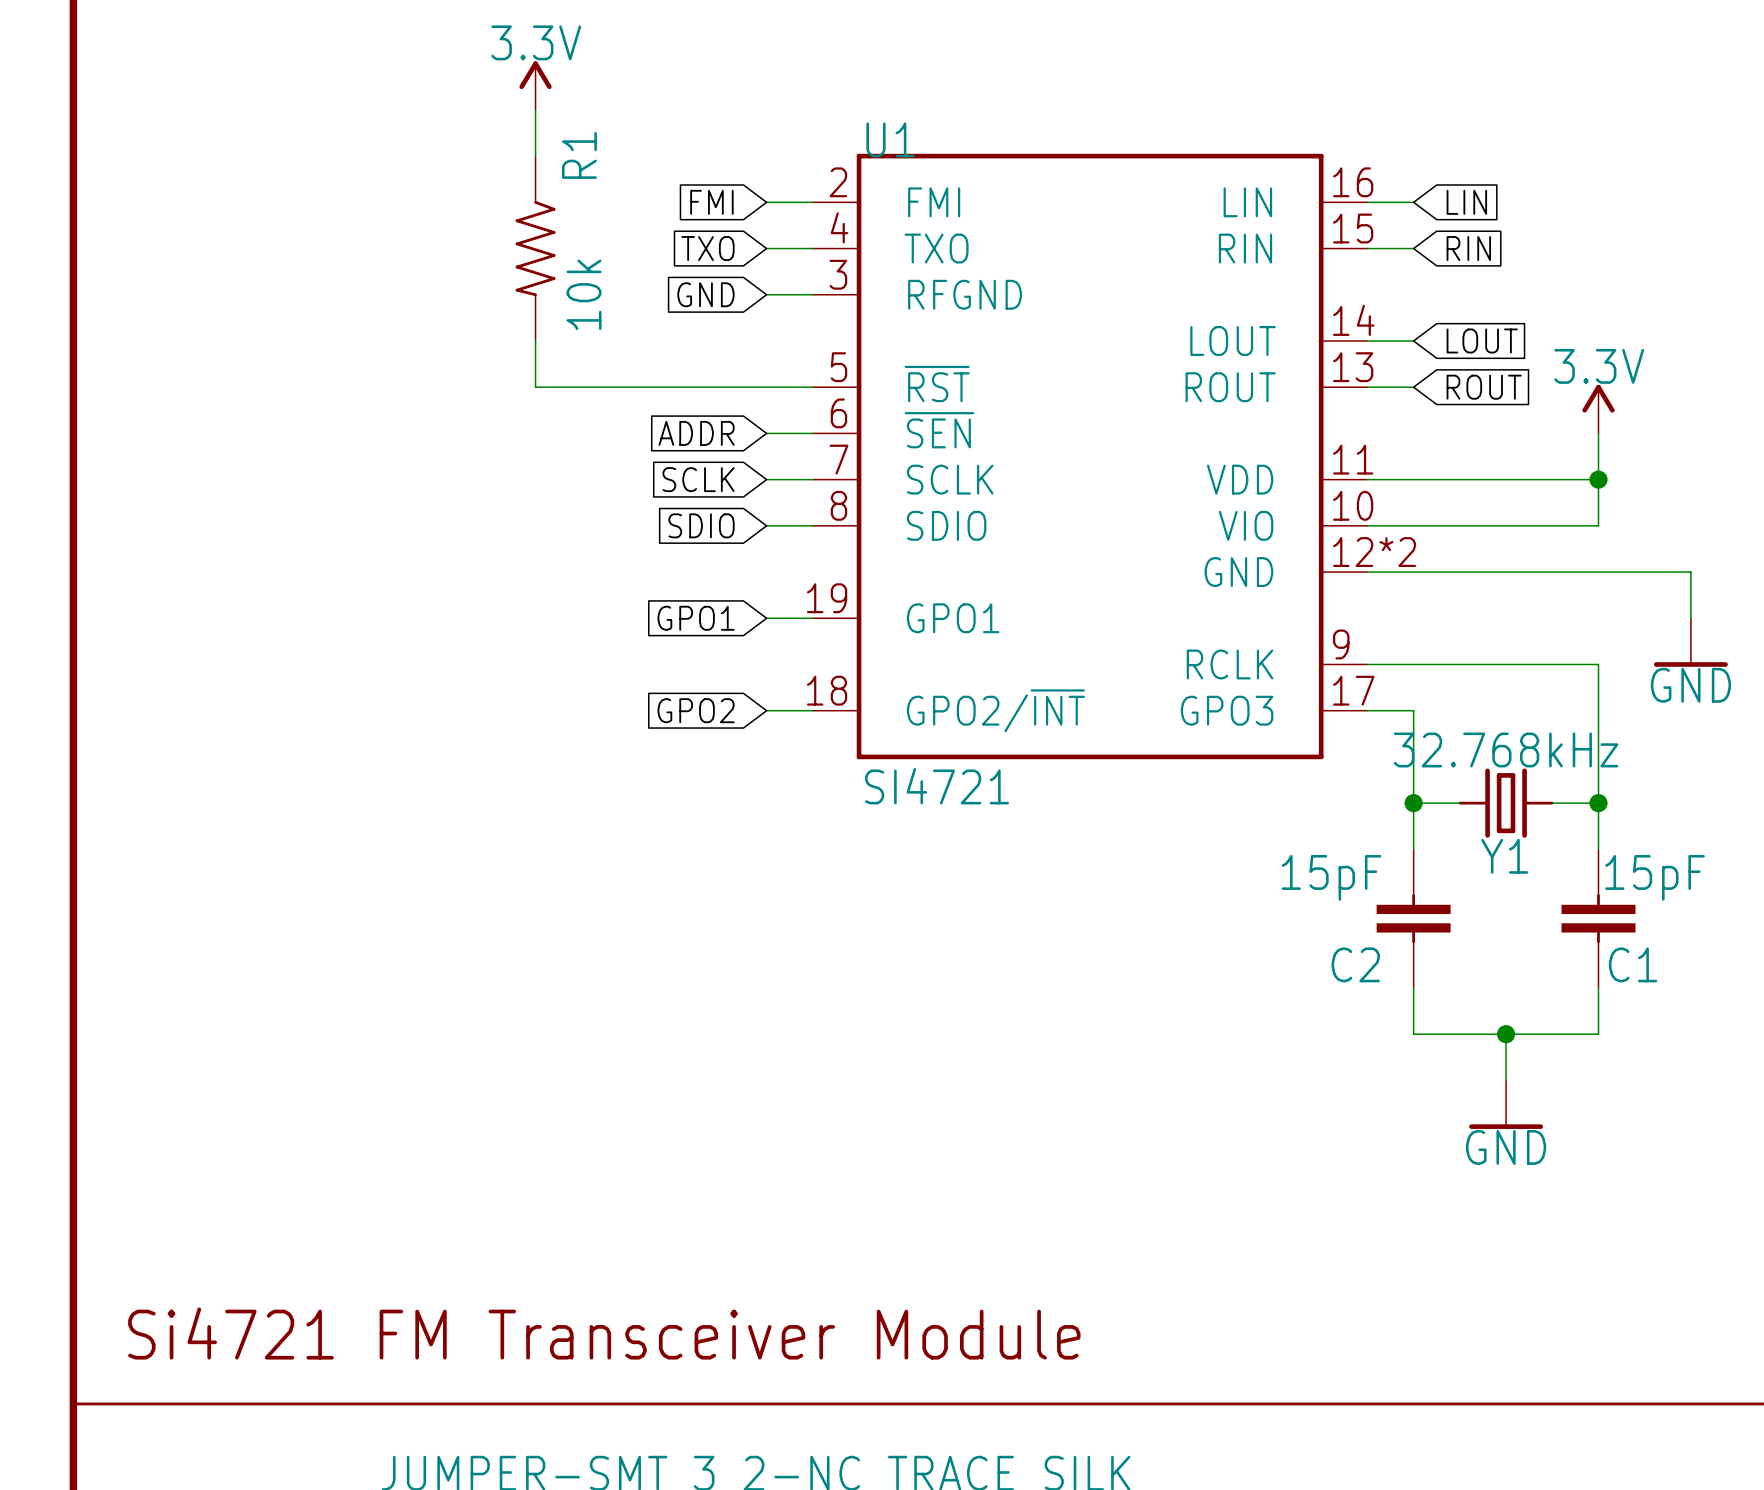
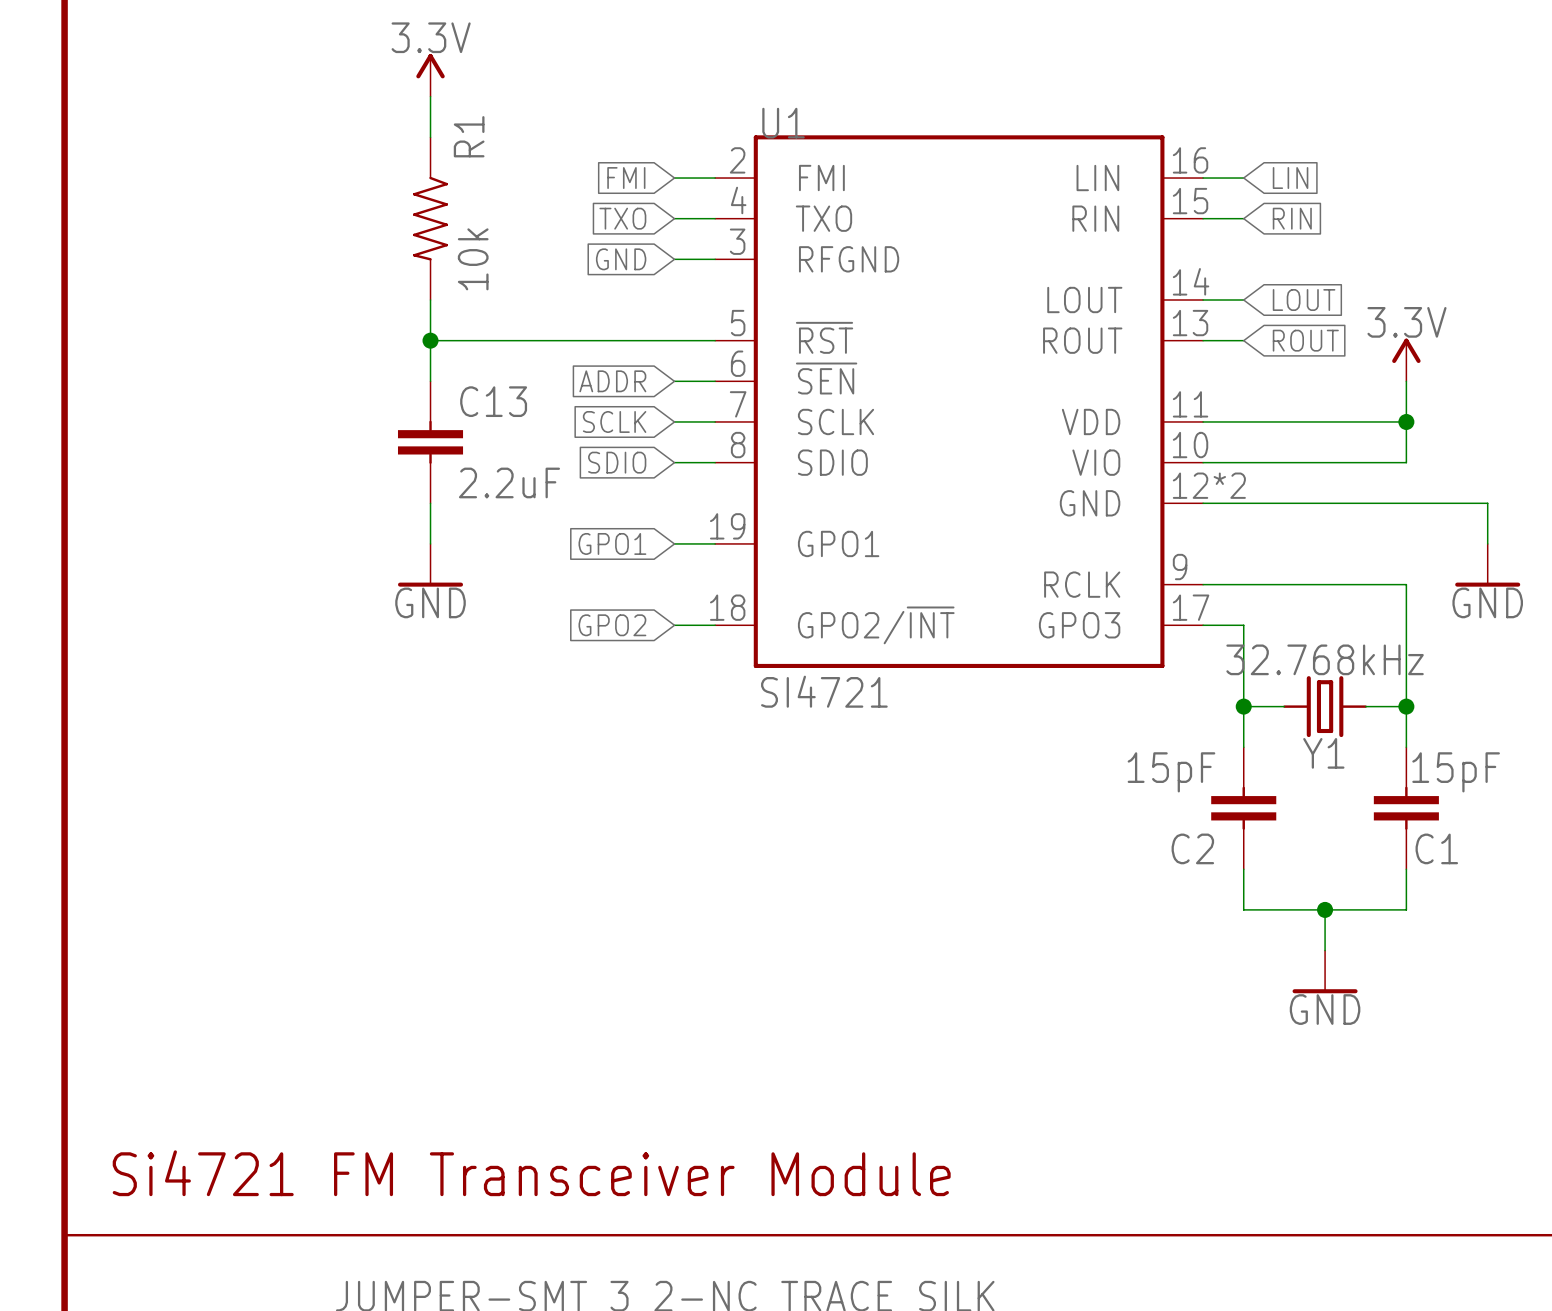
power symbol position: 3.3V (535, 85) -> 3.3V (430, 75)
wire: (535, 109) (535, 156) -> (430, 96) (430, 137)
R1 position: (535, 248) -> (430, 218)
wire: none -> (430, 300) (430, 381)
wire: (535, 340) (535, 387) -> (430, 340) (471, 340)
junction: none -> (430, 340)
C13: none -> 2.2uF (430, 442)
wire: none -> (430, 503) (430, 543)
power symbol: none -> GND (430, 565)

